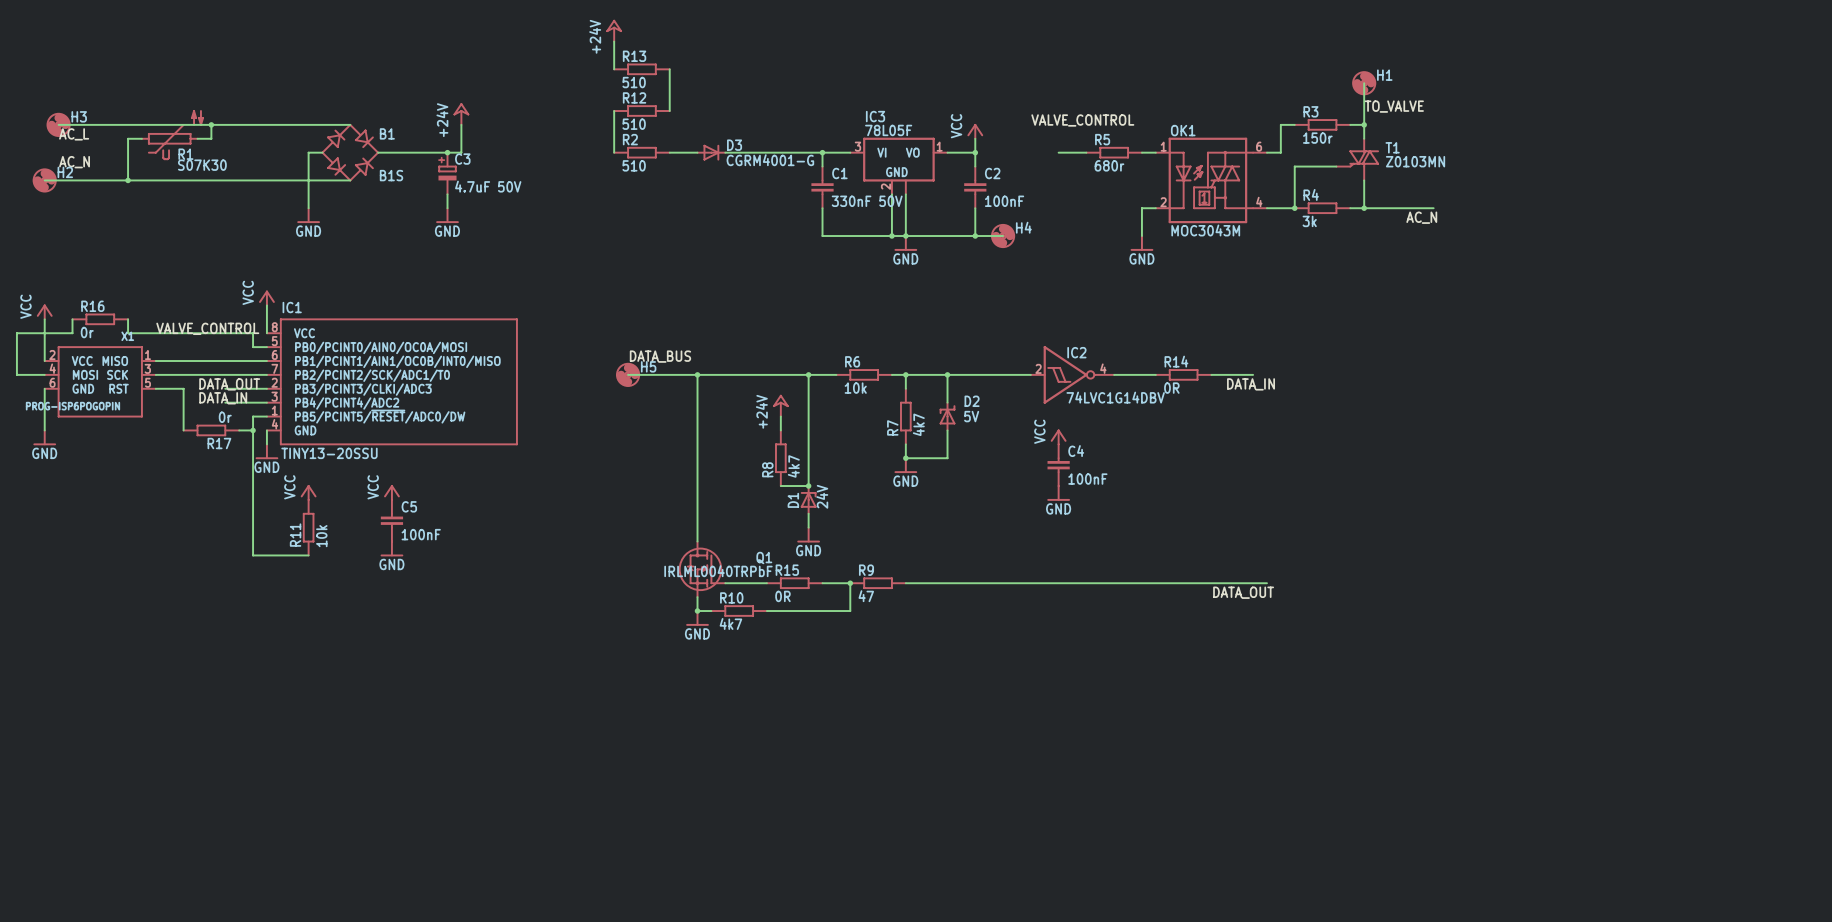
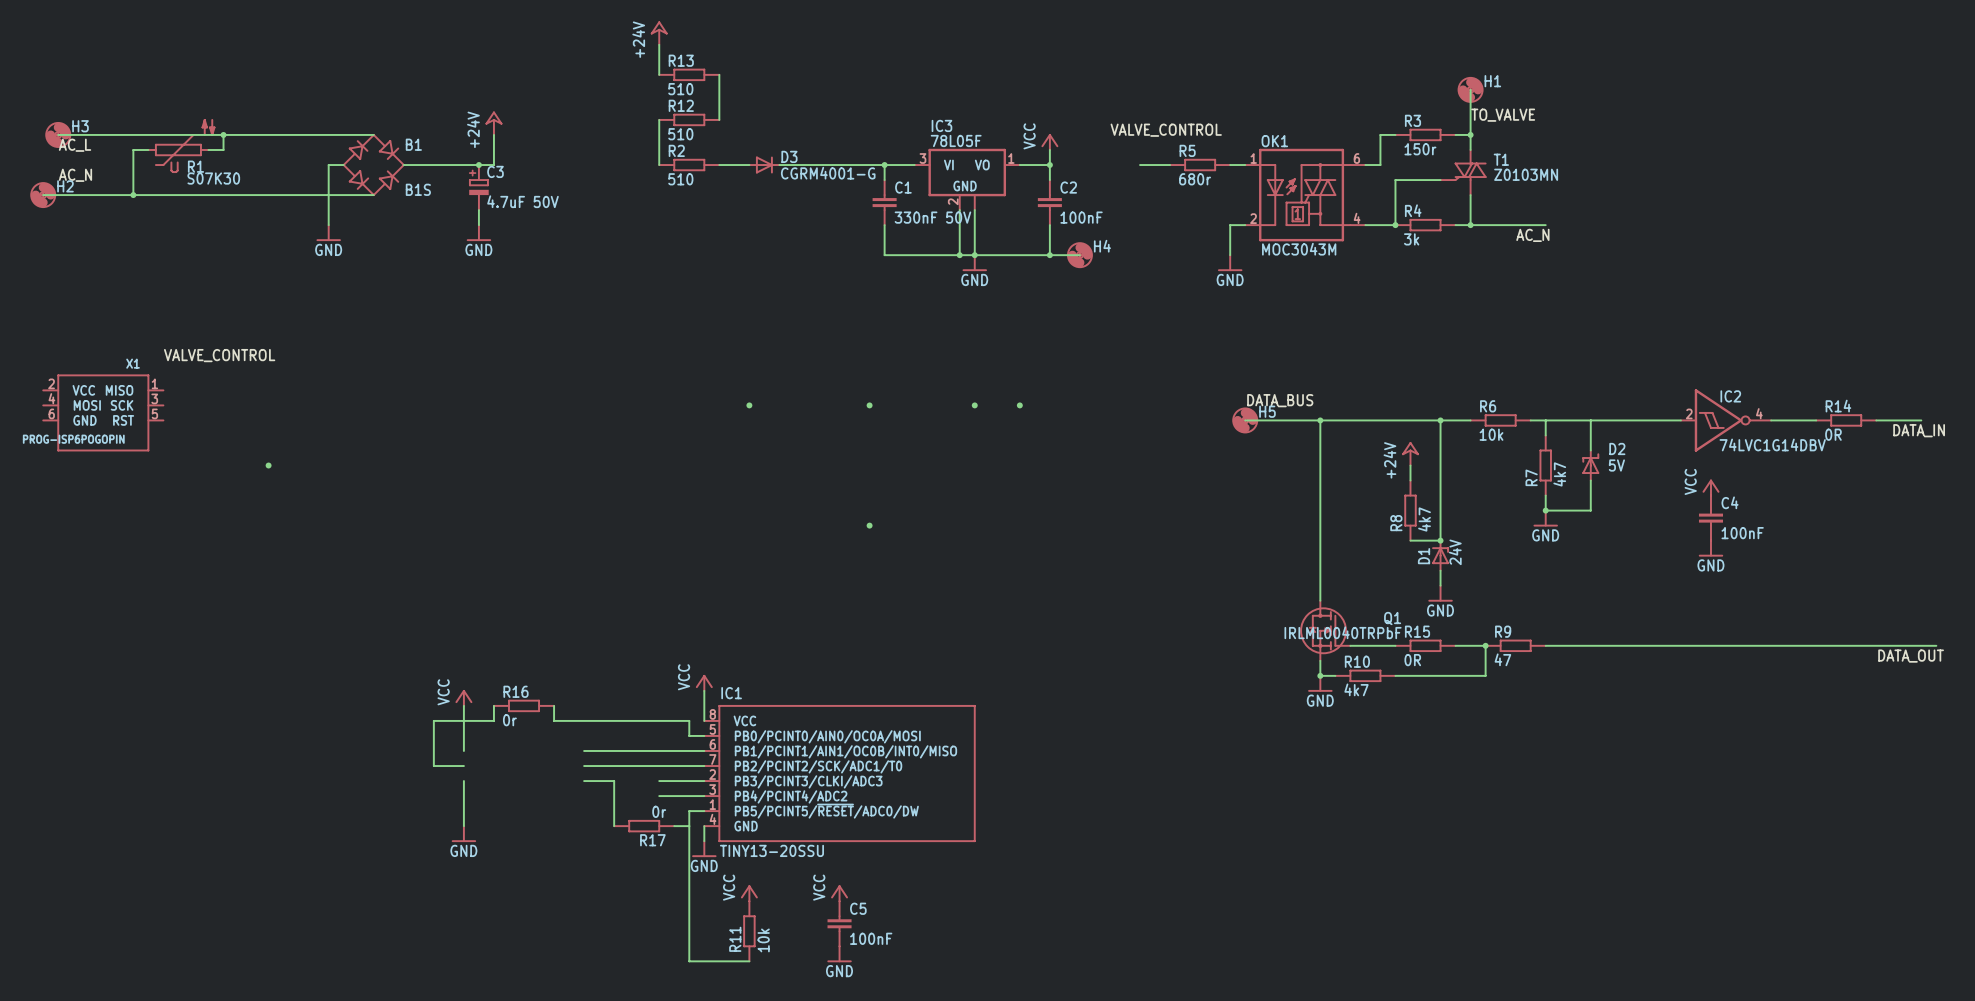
power symbol: VCC (266, 298) -> none
wire: (266, 305) (266, 333) -> none
power symbol: VCC (44, 312) -> none
wire: (44, 319) (44, 361) -> none
wire: (72, 319) (72, 333) (16, 333) (16, 374) (44, 374) -> none
R16 position: (100, 319) -> (524, 705)
wire: (128, 319) (128, 333) (253, 333) (253, 347) (266, 347) -> none
label: DATA_BUS (660, 356) -> none
wire: (155, 361) (266, 361) -> none
wire: (155, 374) (266, 374) -> none
wire: (628, 374) (836, 374) -> none
H5 position: (628, 374) -> (1245, 420)
wire: (697, 374) (697, 541) -> none
wire: (808, 374) (808, 486) (780, 486) -> none
R6 position: (864, 374) -> (1500, 420)
wire: (891, 374) (1030, 374) -> none
wire: (905, 374) (905, 388) -> none
wire: (947, 374) (947, 402) -> none
IC2 position: (1072, 374) -> (1726, 420)
wire: (1114, 374) (1155, 374) -> none
R14 position: (1183, 374) -> (1846, 420)
wire: (1211, 374) (1253, 374) -> none
IC1 position: (392, 381) -> (839, 773)
label: DATA_OUT (229, 384) -> none
label: DATA_IN (1251, 384) -> DATA_BUS (1280, 400)
wire: (44, 388) (44, 430) -> none
wire: (155, 388) (183, 388) (183, 430) -> none
wire: (225, 388) (266, 388) -> none
wire: none -> (1245, 420) (1470, 420)
wire: none -> (1320, 420) (1320, 600)
junction: none -> (1320, 420)
wire: none -> (1440, 420) (1440, 540) (1410, 540)
junction: none -> (1440, 420)
wire: none -> (1530, 420) (1680, 420)
wire: none -> (1545, 420) (1545, 435)
wire: none -> (1590, 420) (1590, 450)
wire: none -> (1771, 420) (1816, 420)
wire: none -> (1876, 420) (1921, 420)
label: DATA_IN (223, 398) -> none
label: none -> DATA_IN (1919, 430)
wire: (225, 402) (266, 402) -> none
power symbol: +24V (780, 405) -> none
wire: (266, 416) (253, 416) (253, 555) (308, 555) -> none
wire: (780, 416) (780, 430) -> none
R7 position: (905, 416) -> (1545, 465)
D2 position: (947, 416) -> (1590, 465)
power symbol: none -> +24V (1410, 453)
R17 position: (211, 430) -> (644, 826)
wire: (239, 430) (253, 430) -> none
wire: (266, 430) (266, 444) -> none
wire: (947, 430) (947, 458) (905, 458) (905, 444) -> none
wire: none -> (1410, 465) (1410, 480)
power symbol: GND (44, 437) -> none
power symbol: VCC (1058, 437) -> none
wire: none -> (1590, 480) (1590, 510) (1545, 510) (1545, 495)
power symbol: none -> VCC (1710, 487)
power symbol: GND (266, 451) -> none
R8 position: (780, 458) -> (1410, 510)
junction: (905, 458) -> none
power symbol: GND (905, 465) -> none
C4 position: (1058, 465) -> (1710, 518)
junction: none -> (1545, 510)
power symbol: none -> GND (1545, 518)
power symbol: VCC (308, 492) -> none
power symbol: VCC (391, 492) -> none
power symbol: GND (1058, 493) -> none
D1 position: (808, 499) -> (1440, 555)
junction: none -> (1440, 540)
power symbol: none -> GND (1710, 548)
wire: (808, 513) (808, 527) -> none
C5 position: (391, 520) -> (839, 923)
R11 position: (308, 527) -> (749, 931)
wire: none -> (1440, 570) (1440, 585)
power symbol: GND (808, 534) -> none
power symbol: GND (391, 548) -> none
power symbol: none -> GND (1440, 593)
Q1 position: (702, 569) -> (1325, 630)
wire: (725, 583) (766, 583) -> none
R15 position: (794, 583) -> (1425, 645)
wire: (822, 583) (850, 583) (850, 611) (766, 611) -> none
junction: (850, 583) -> none
R9 position: (878, 583) -> (1515, 645)
wire: (905, 583) (1266, 583) -> none
label: DATA_OUT (1243, 592) -> none
wire: (697, 597) (697, 611) (711, 611) -> none
wire: none -> (1350, 645) (1395, 645)
wire: none -> (1455, 645) (1485, 645) (1485, 675) (1395, 675)
junction: none -> (1485, 645)
wire: none -> (1545, 645) (1936, 645)
label: none -> DATA_OUT (1911, 656)
junction: (697, 611) -> none
R10 position: (739, 611) -> (1365, 675)
wire: none -> (1320, 660) (1320, 675) (1335, 675)
power symbol: GND (697, 618) -> none
junction: none -> (1320, 675)
power symbol: none -> VCC (704, 683)
power symbol: none -> GND (1320, 683)
wire: none -> (704, 690) (704, 720)
power symbol: none -> VCC (463, 698)
wire: none -> (463, 705) (463, 750)
wire: none -> (493, 705) (493, 720) (433, 720) (433, 766) (463, 766)
wire: none -> (554, 705) (554, 720) (689, 720) (689, 735) (704, 735)
wire: none -> (584, 750) (704, 750)
wire: none -> (584, 766) (704, 766)
wire: none -> (463, 781) (463, 826)
wire: none -> (584, 781) (614, 781) (614, 826)
wire: none -> (659, 781) (704, 781)
wire: none -> (659, 796) (704, 796)
wire: none -> (704, 811) (689, 811) (689, 961) (749, 961)
wire: none -> (674, 826) (689, 826)
wire: none -> (704, 826) (704, 841)
power symbol: none -> GND (463, 834)
power symbol: none -> GND (704, 849)
power symbol: none -> VCC (749, 893)
power symbol: none -> VCC (839, 893)
power symbol: none -> GND (839, 954)

